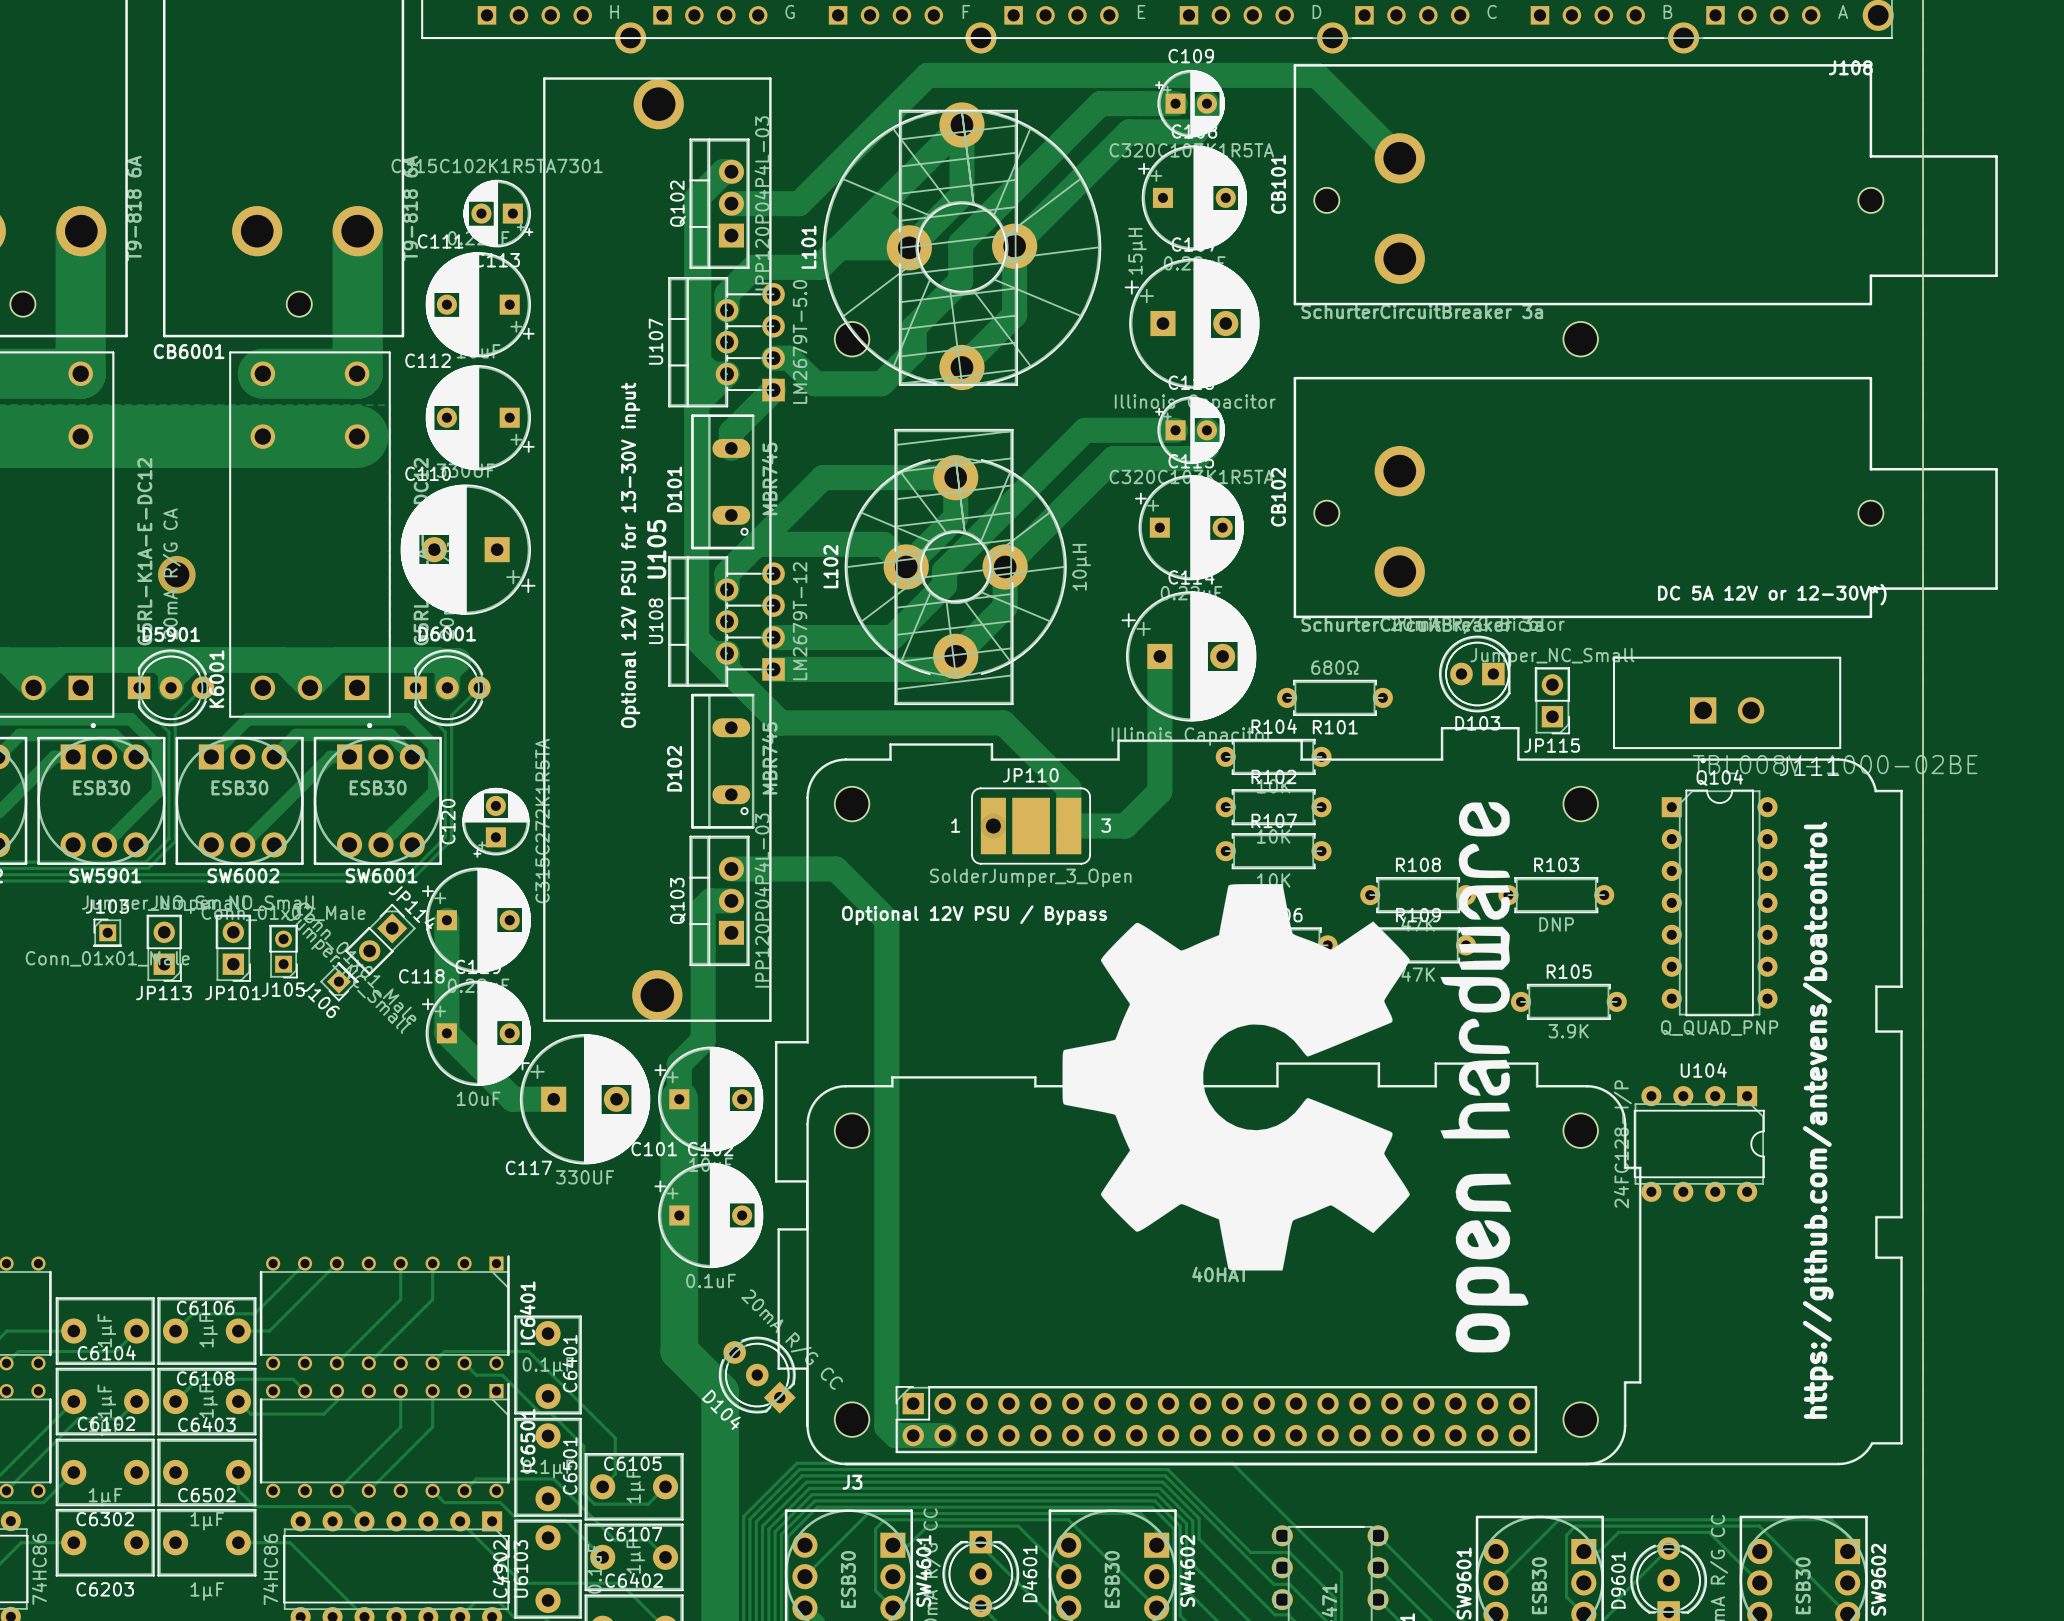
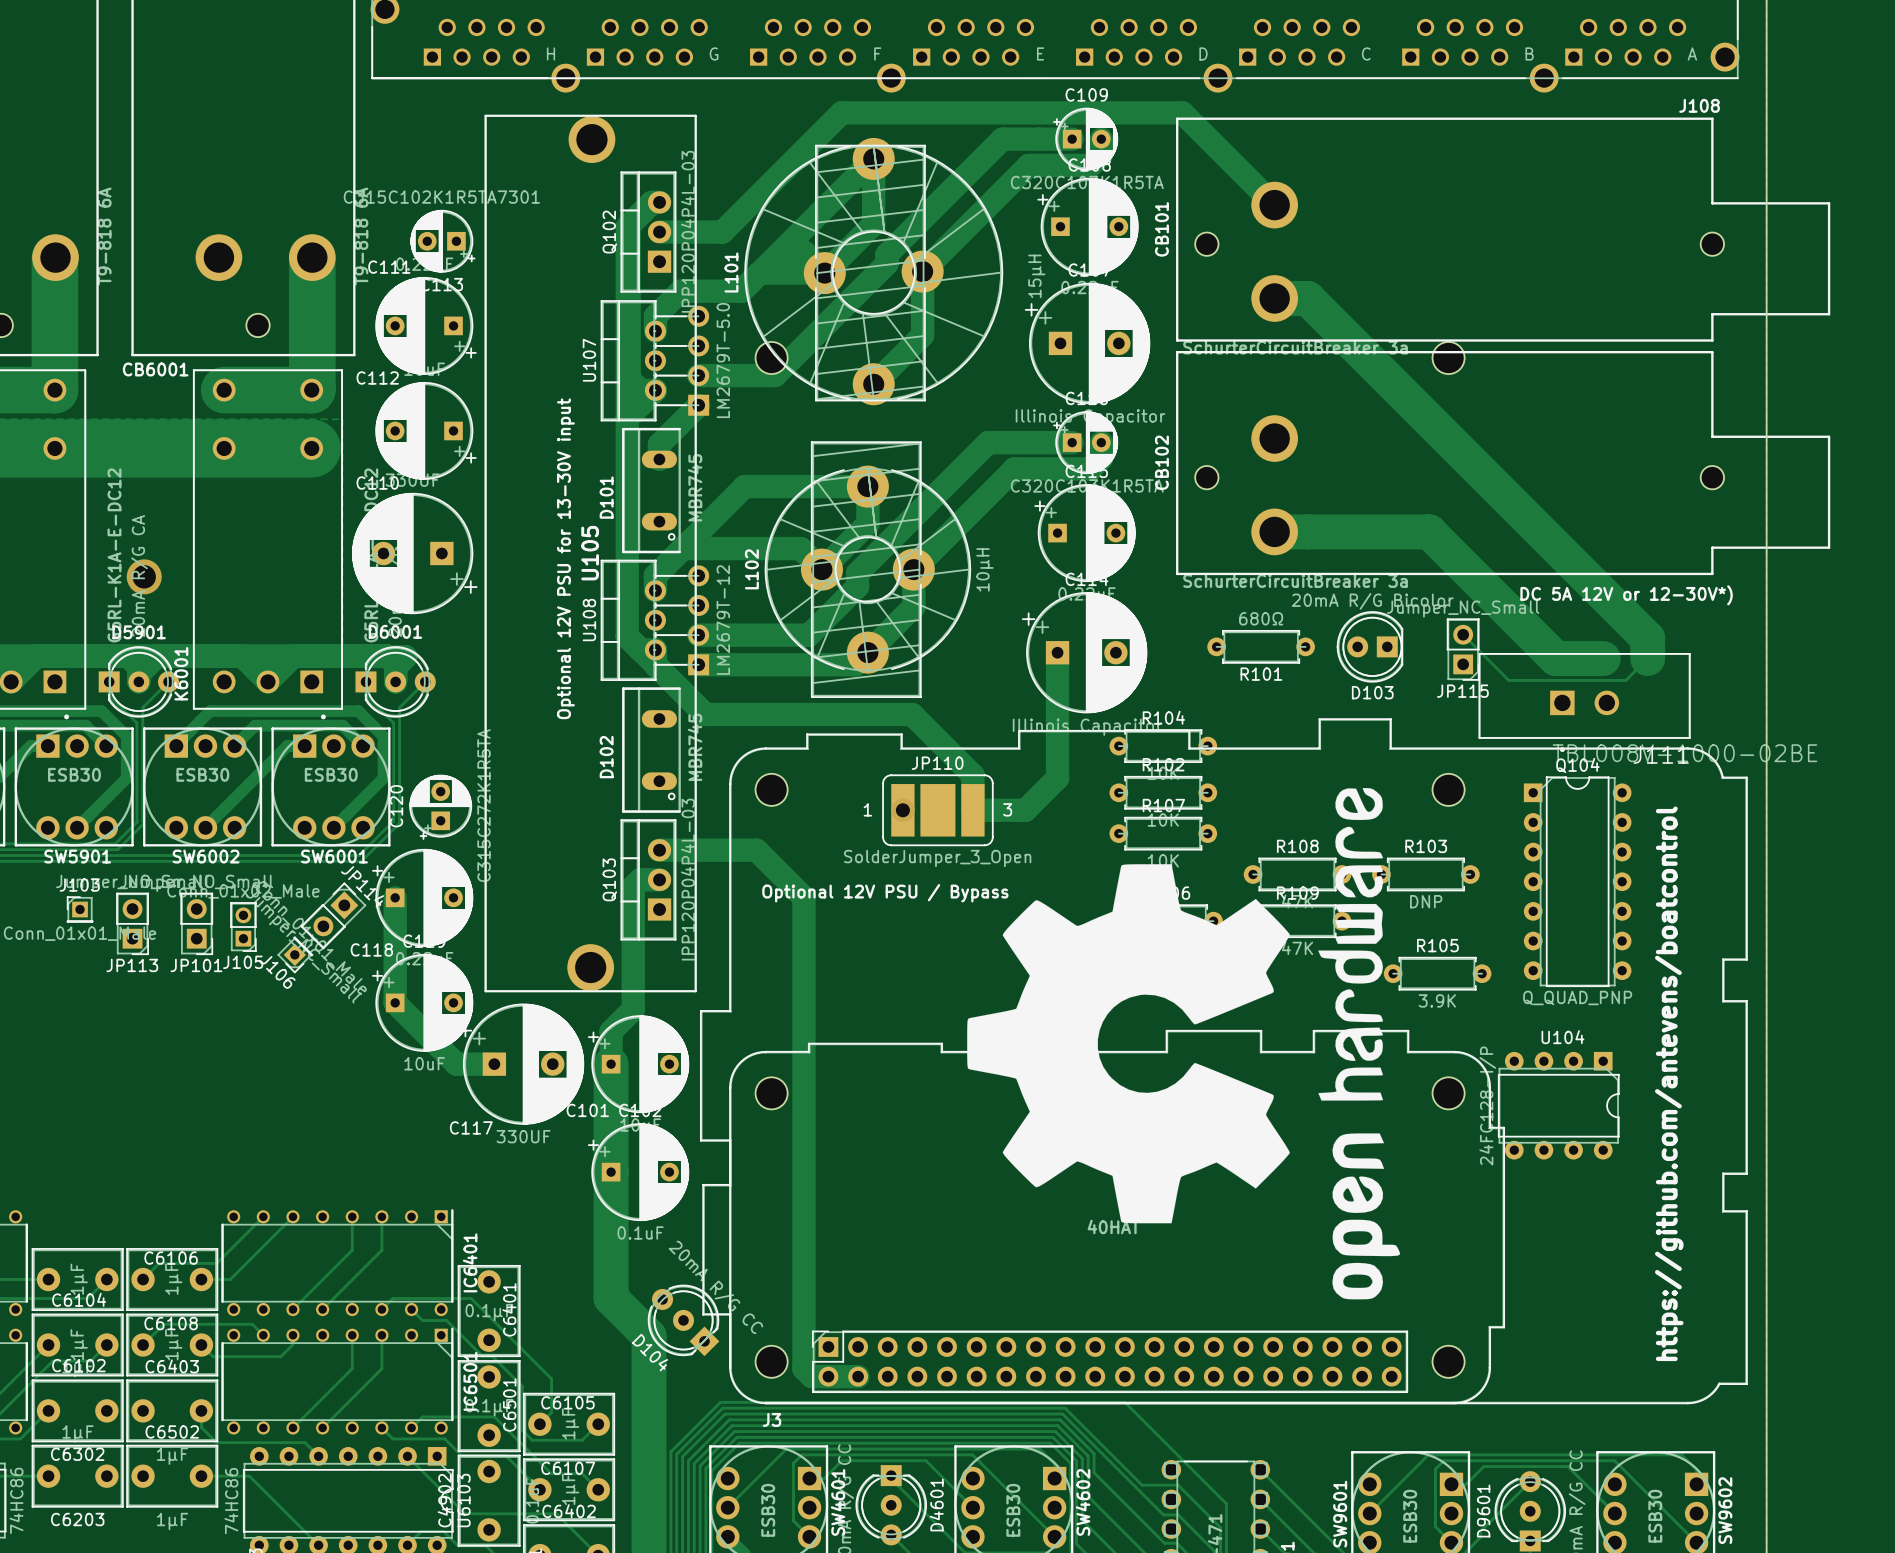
track: (1294, 75) (1316, 75) (1399, 158) -> (1182, 112) (1274, 205)
CB101 position: (1645, 184) -> (1503, 229)
track: (976, 227) (960, 243) (960, 280) (914, 327) (914, 351) (881, 383) (815, 383) (789, 358) -> (887, 254) (887, 263) (774, 375) (713, 375)
track: none -> (1274, 298) (1307, 298) (1647, 638) (1647, 658) (1625, 680) (1508, 680) (1463, 634)
CB102 position: (1645, 497) -> (1503, 463)
track: none -> (1274, 531) (1429, 531) (1555, 658) (1603, 658)
D103 position: (1474, 674) -> (1369, 646)
R101 position: (1334, 697) -> (1261, 646)
JP115 position: (1552, 700) -> (1463, 649)

